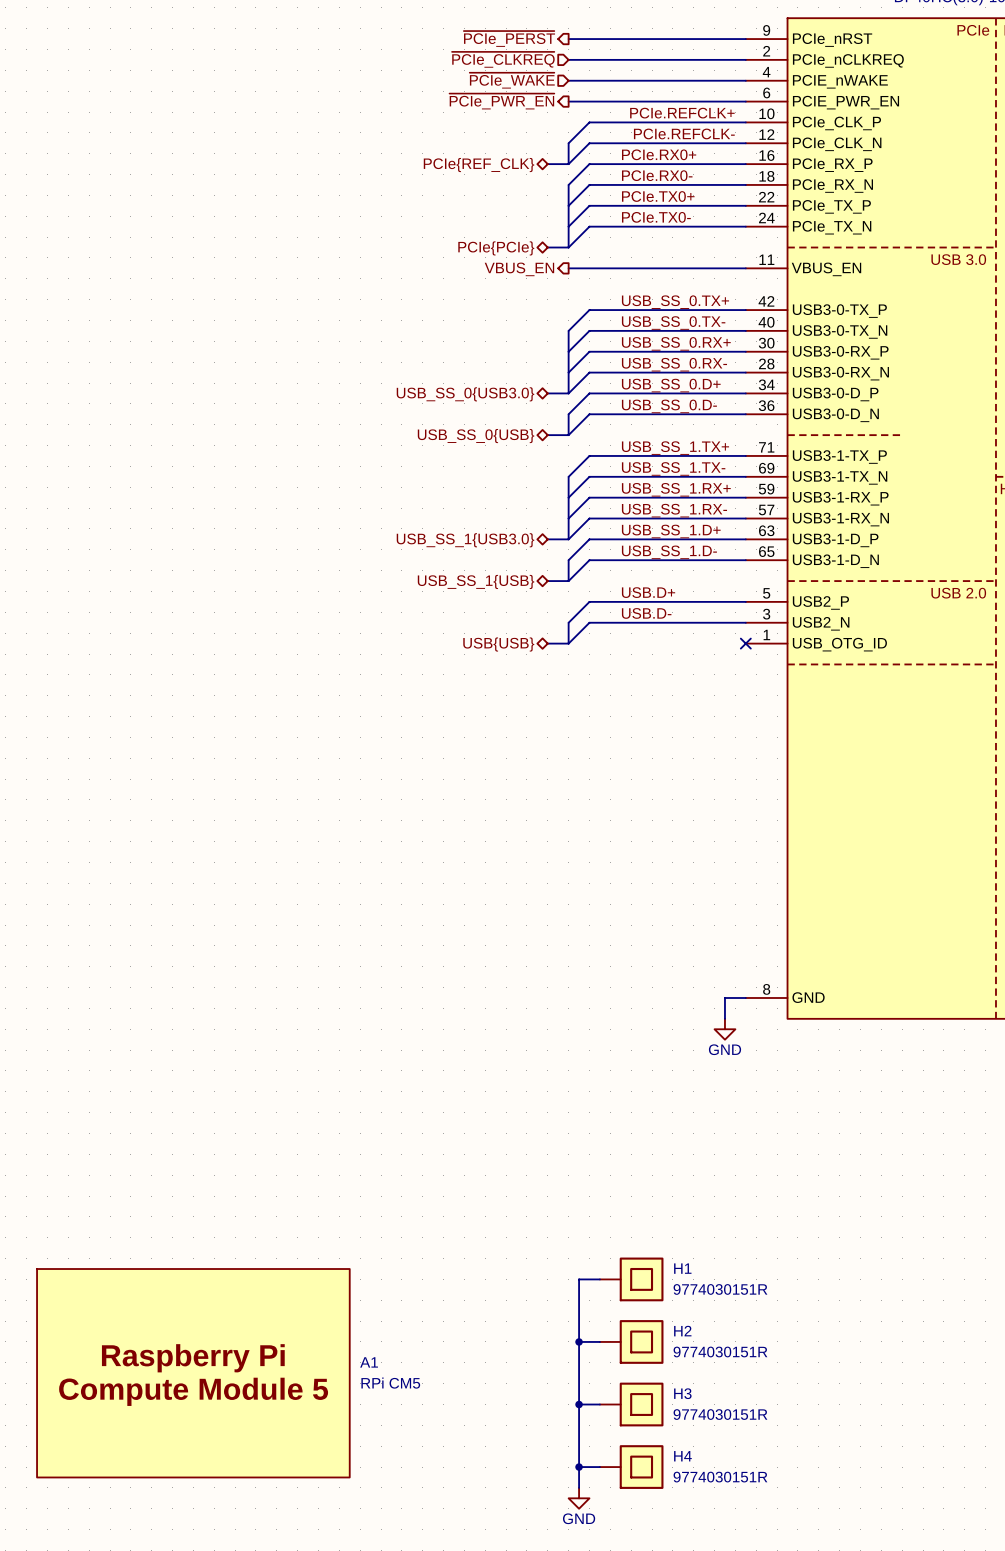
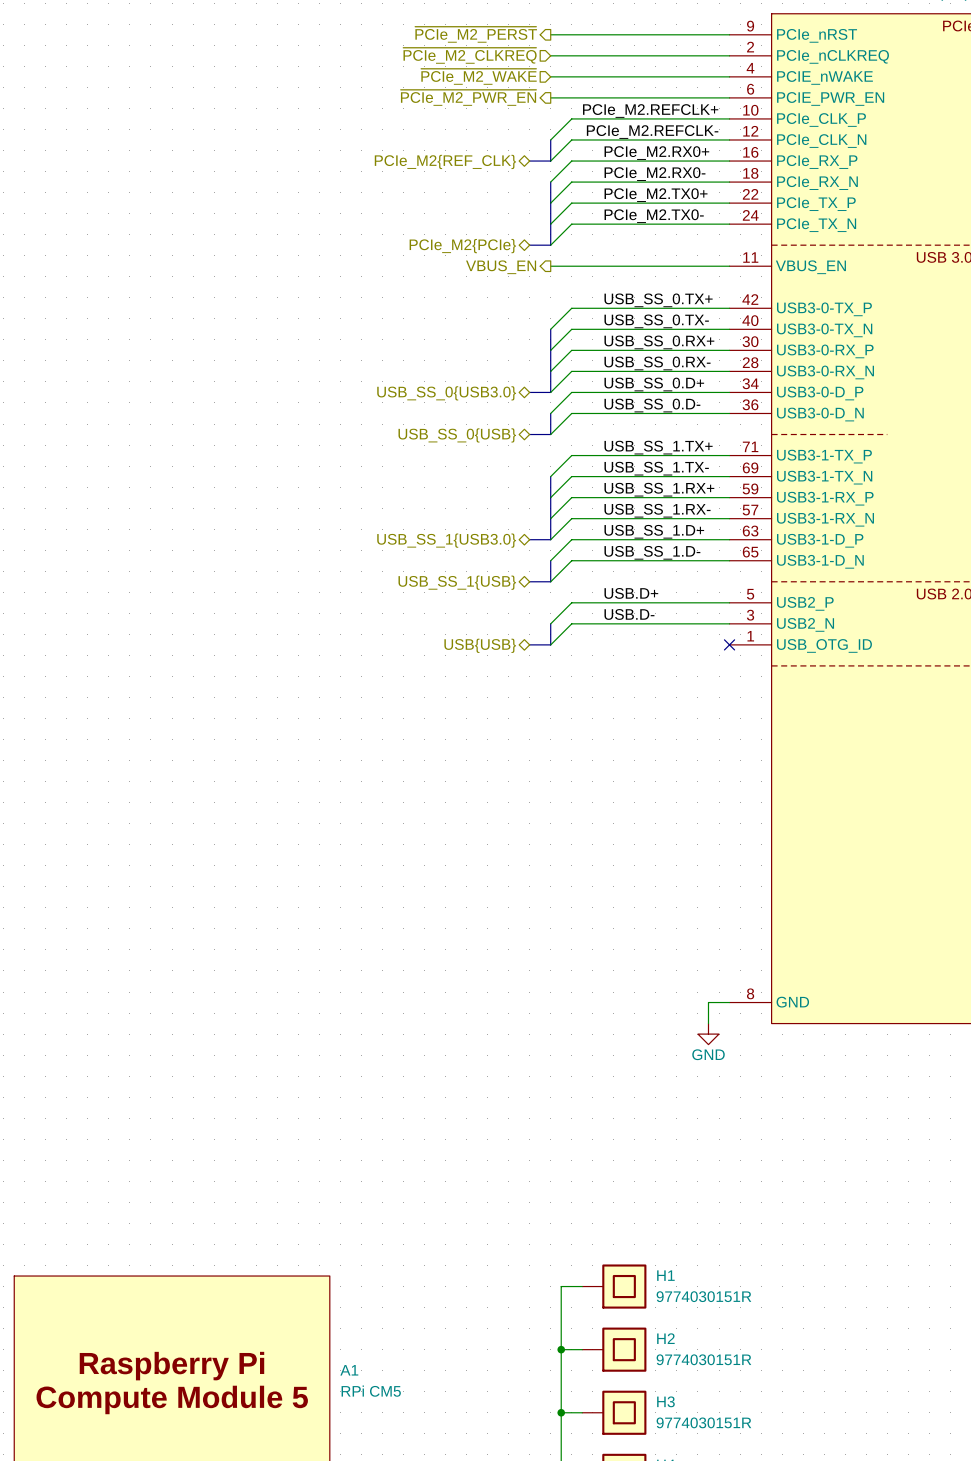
hierarchical label: ~{PCIe_PERST} (509, 38) -> ~{PCIe_M2_PERST} (476, 34)
hierarchical label: ~{PCIe_CLKREQ} (503, 59) -> ~{PCIe_M2_CLKREQ} (469, 55)
hierarchical label: ~{PCIe_WAKE} (512, 80) -> ~{PCIe_M2_WAKE} (478, 76)
hierarchical label: ~{PCIe_PWR_EN} (501, 101) -> ~{PCIe_M2_PWR_EN} (468, 97)
label: PCIe.REFCLK+ (682, 113) -> PCIe_M2.REFCLK+ (650, 111)
label: PCIe.REFCLK- (684, 133) -> PCIe_M2.REFCLK- (652, 132)
label: PCIe.RX0+ (659, 154) -> PCIe_M2.RX0+ (656, 153)
hierarchical label: PCIe{REF_CLK} (479, 165) -> PCIe_M2{REF_CLK} (445, 161)
label: PCIe.RX0- (657, 175) -> PCIe_M2.RX0- (655, 174)
label: PCIe.TX0+ (658, 196) -> PCIe_M2.TX0+ (656, 195)
label: PCIe.TX0- (656, 217) -> PCIe_M2.TX0- (654, 216)
hierarchical label: PCIe{PCIe} (496, 248) -> PCIe_M2{PCIe} (462, 246)

